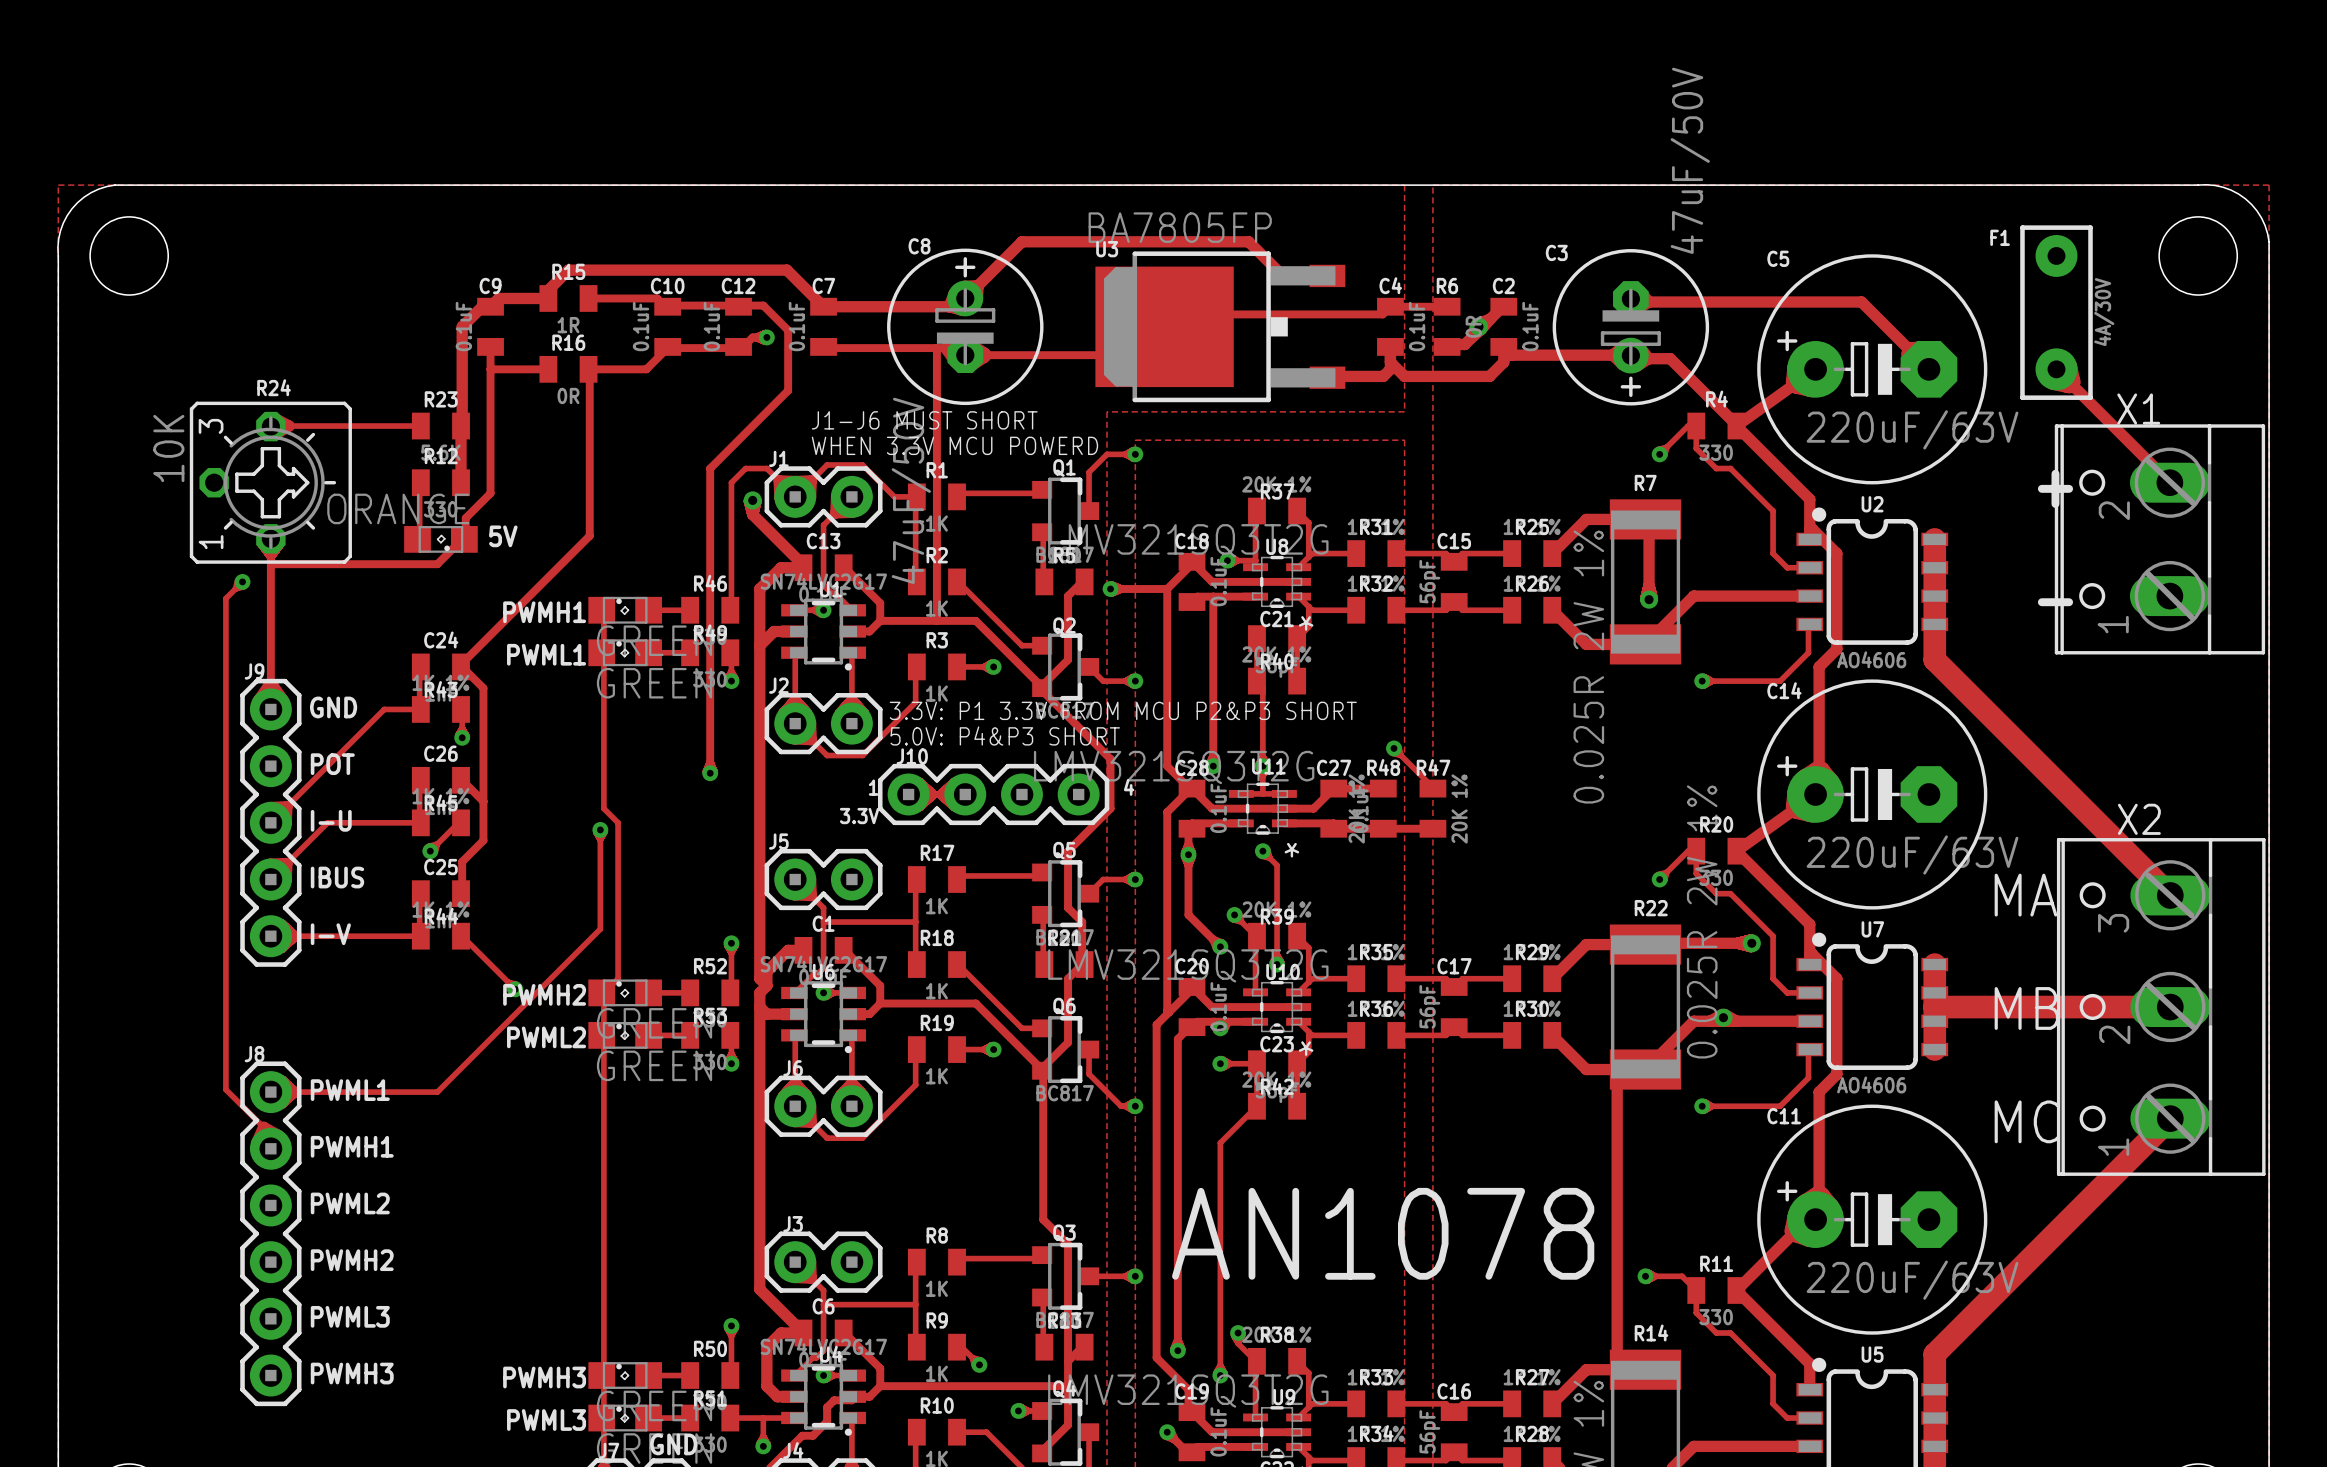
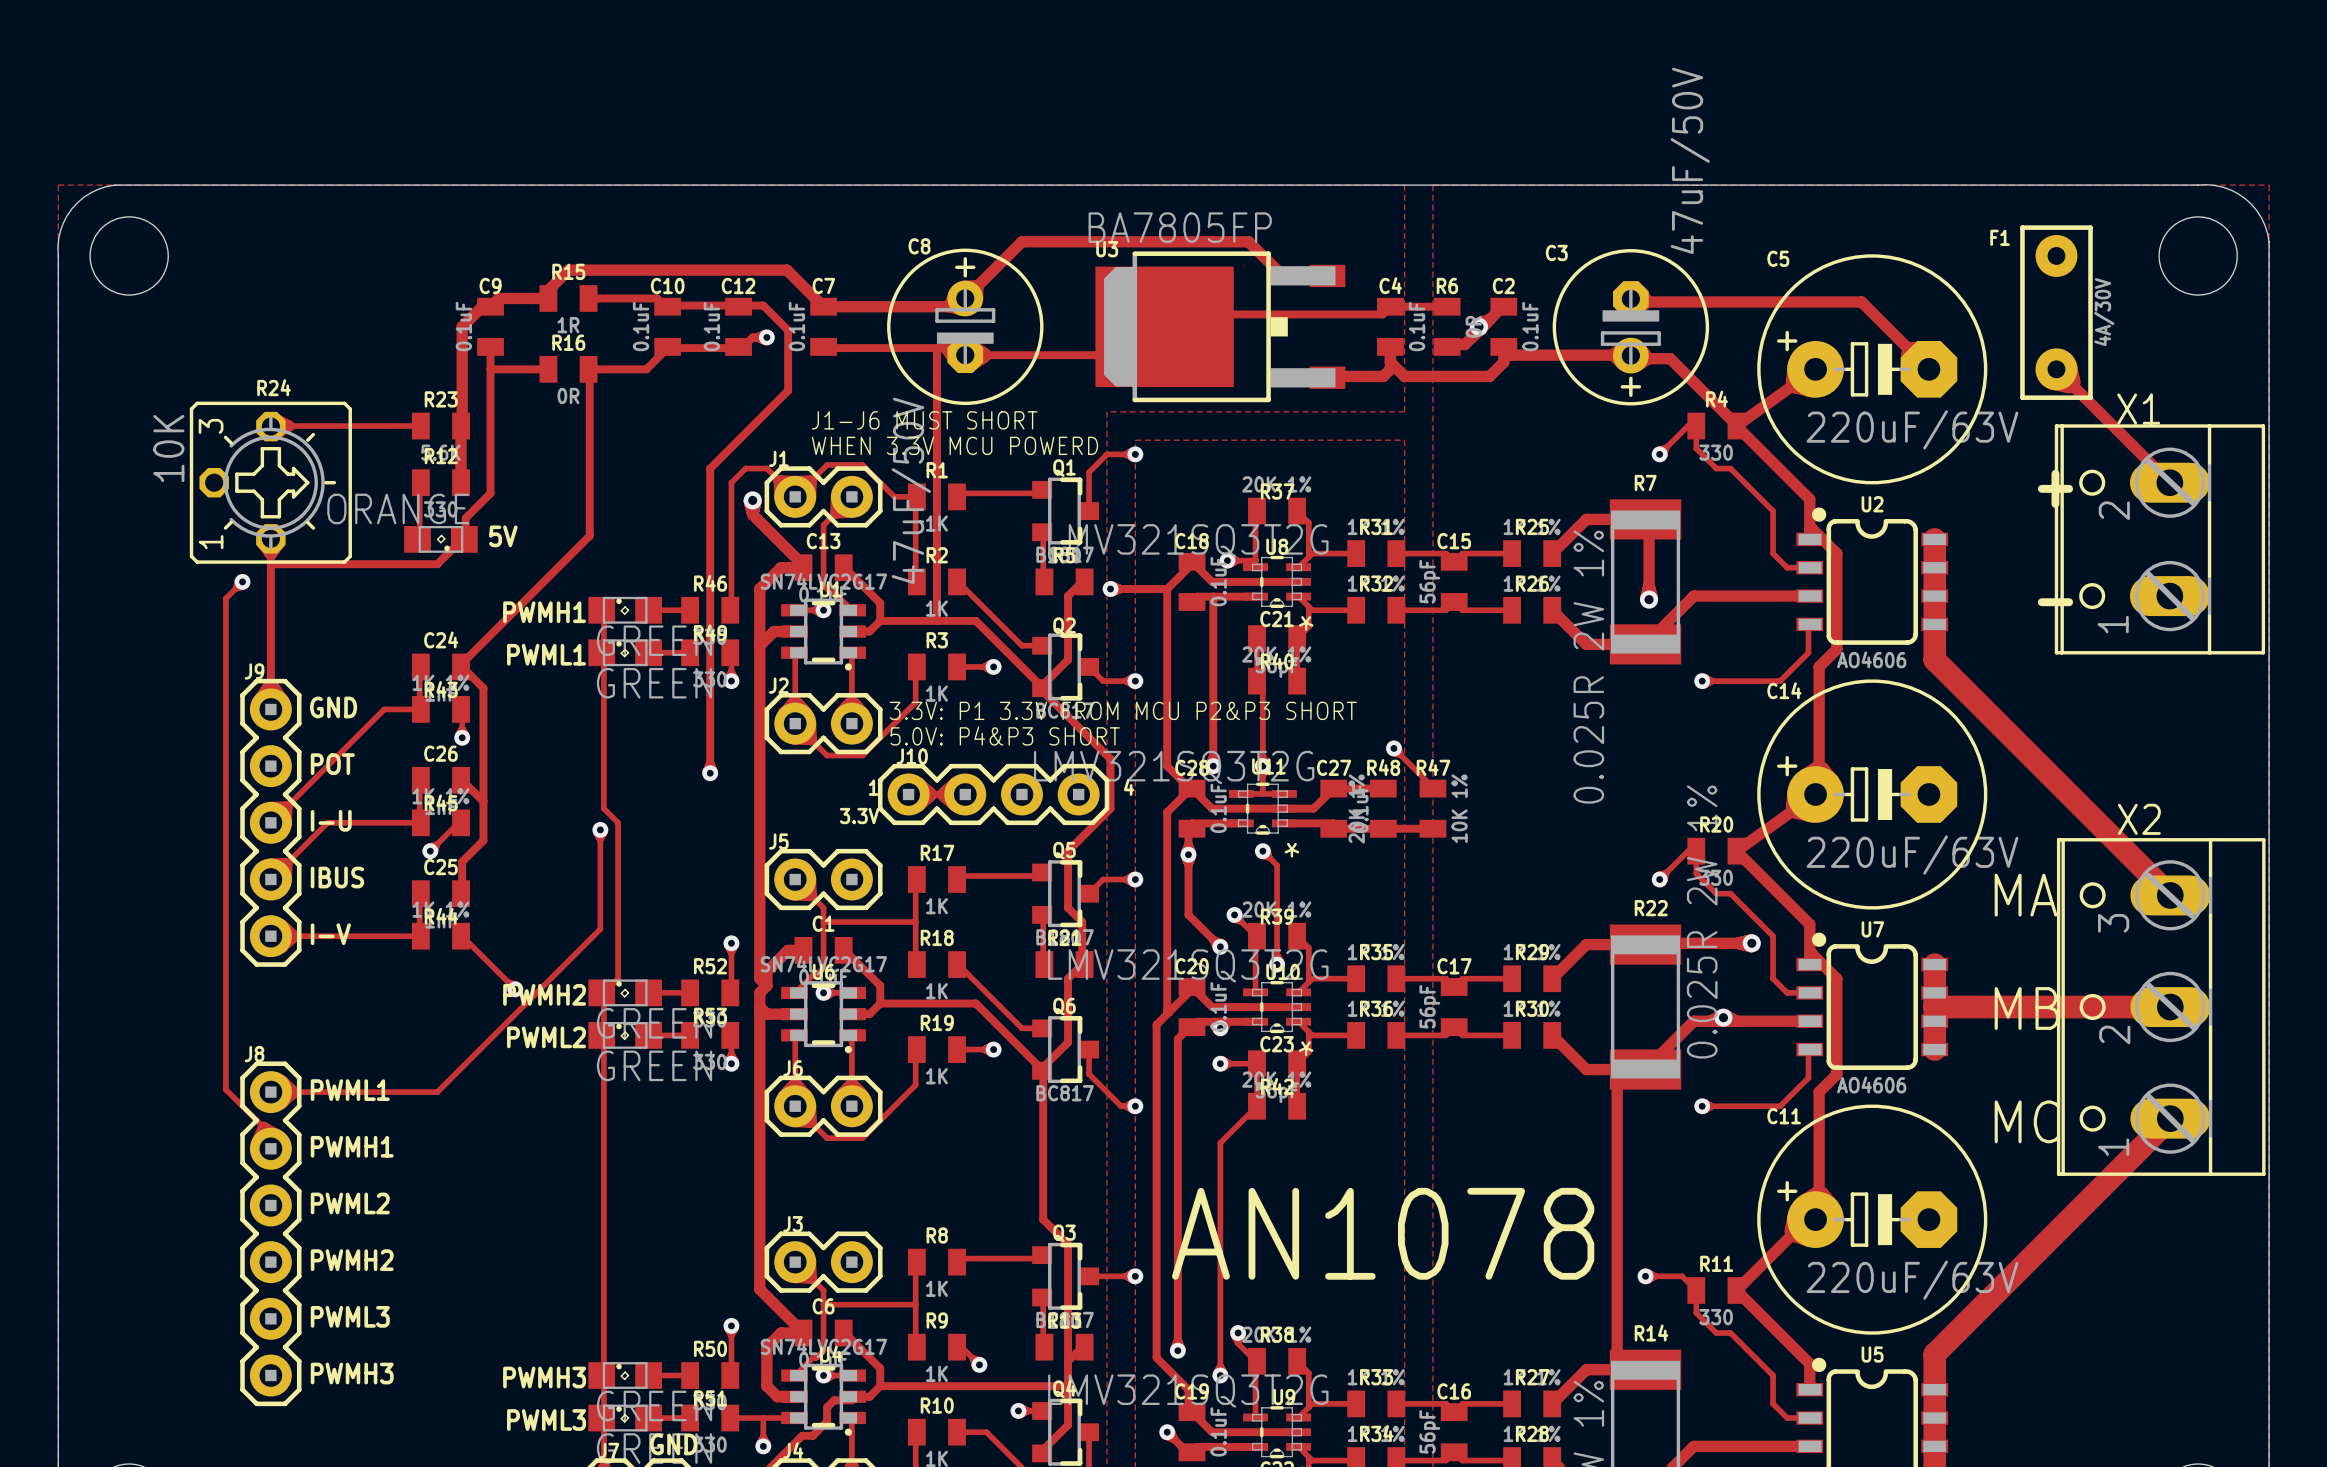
R47 value: 20K 1% (1459, 808) -> 10K 1% (1459, 808)

